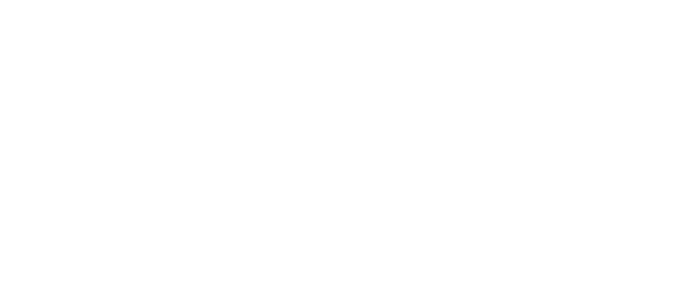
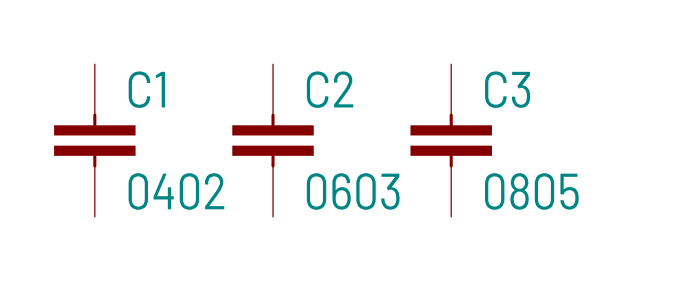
C1: none -> 0402 (94, 140)
C2: none -> 0603 (273, 140)
C3: none -> 0805 (451, 140)

